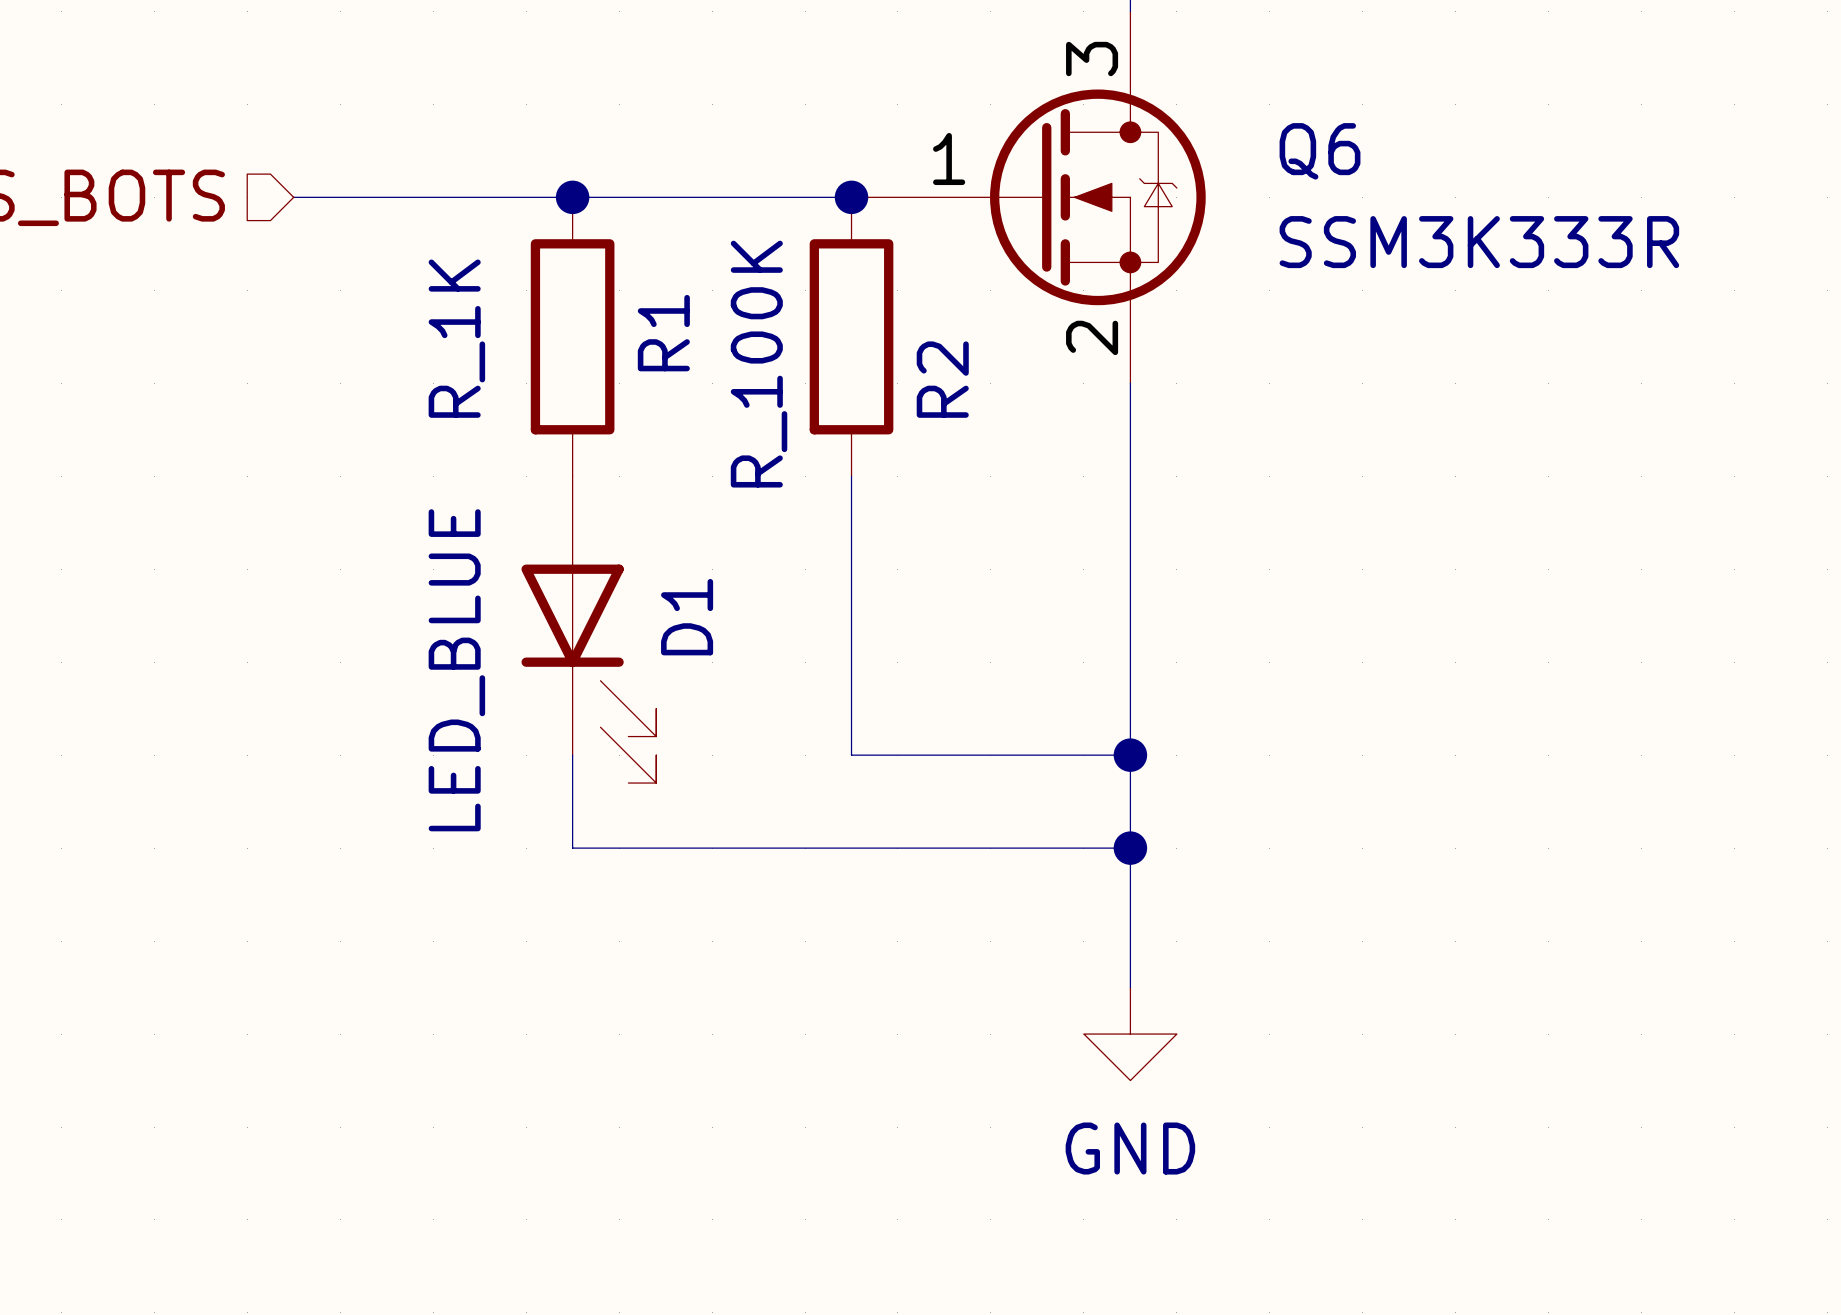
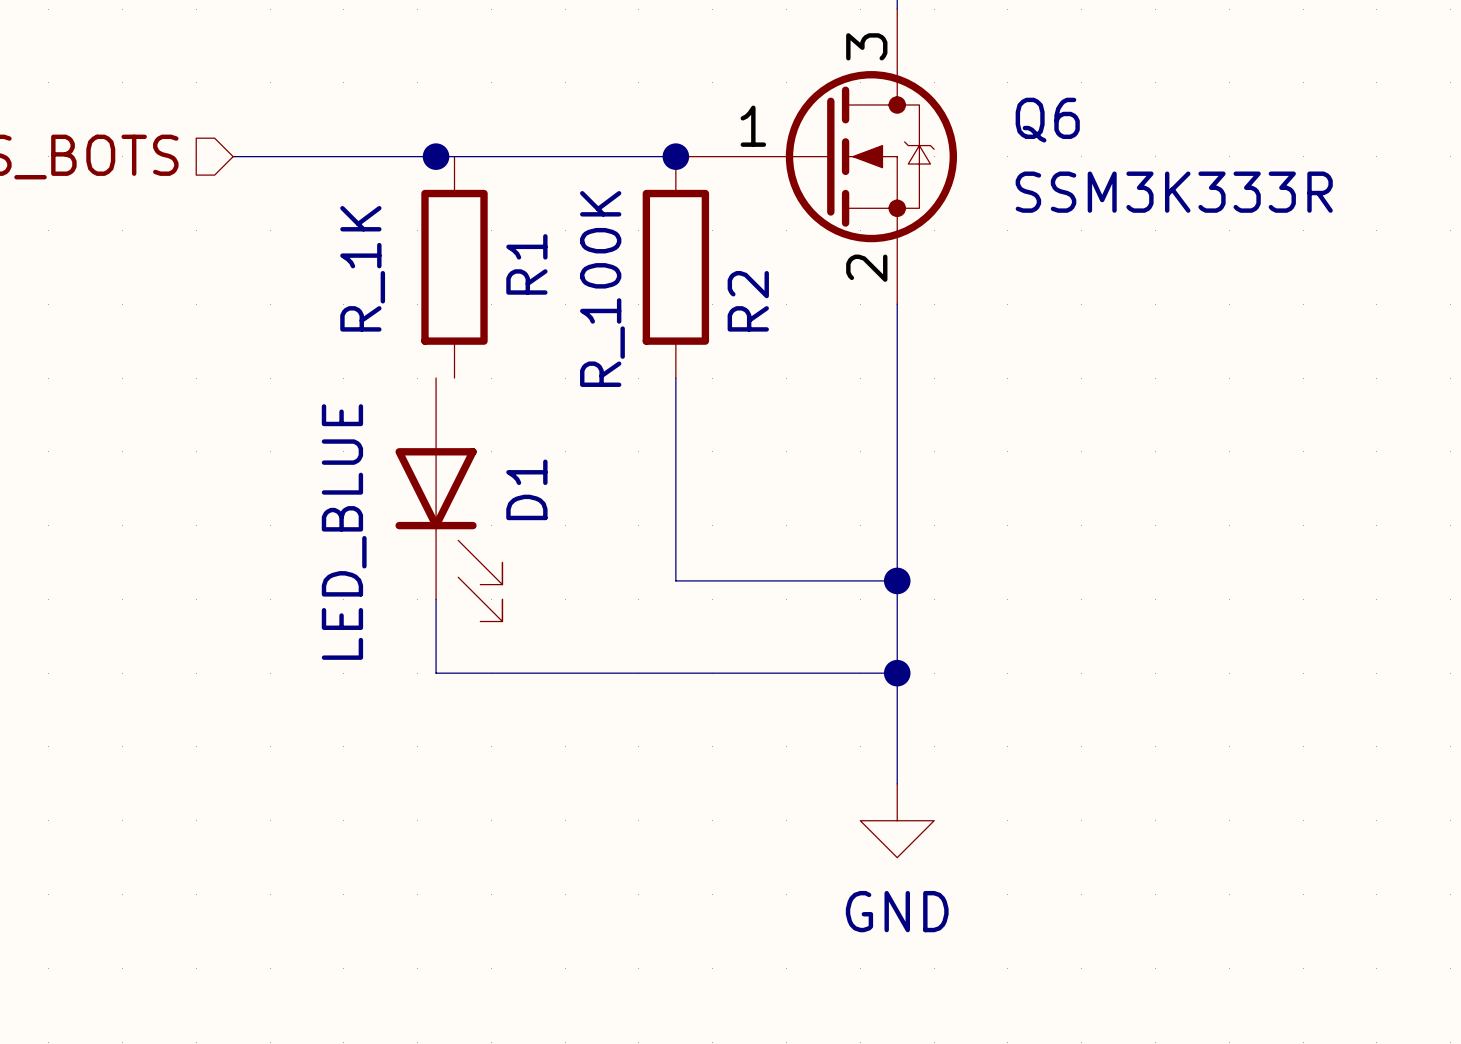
junction position: (572, 197) -> (436, 156)
D1 position: (588, 629) -> (448, 499)
wire: (851, 731) (851, 755) (1130, 755) -> (675, 580) (897, 580)
wire: (572, 755) (572, 848) -> (436, 599) (436, 673) (454, 673)
junction position: (1130, 755) -> (897, 580)

